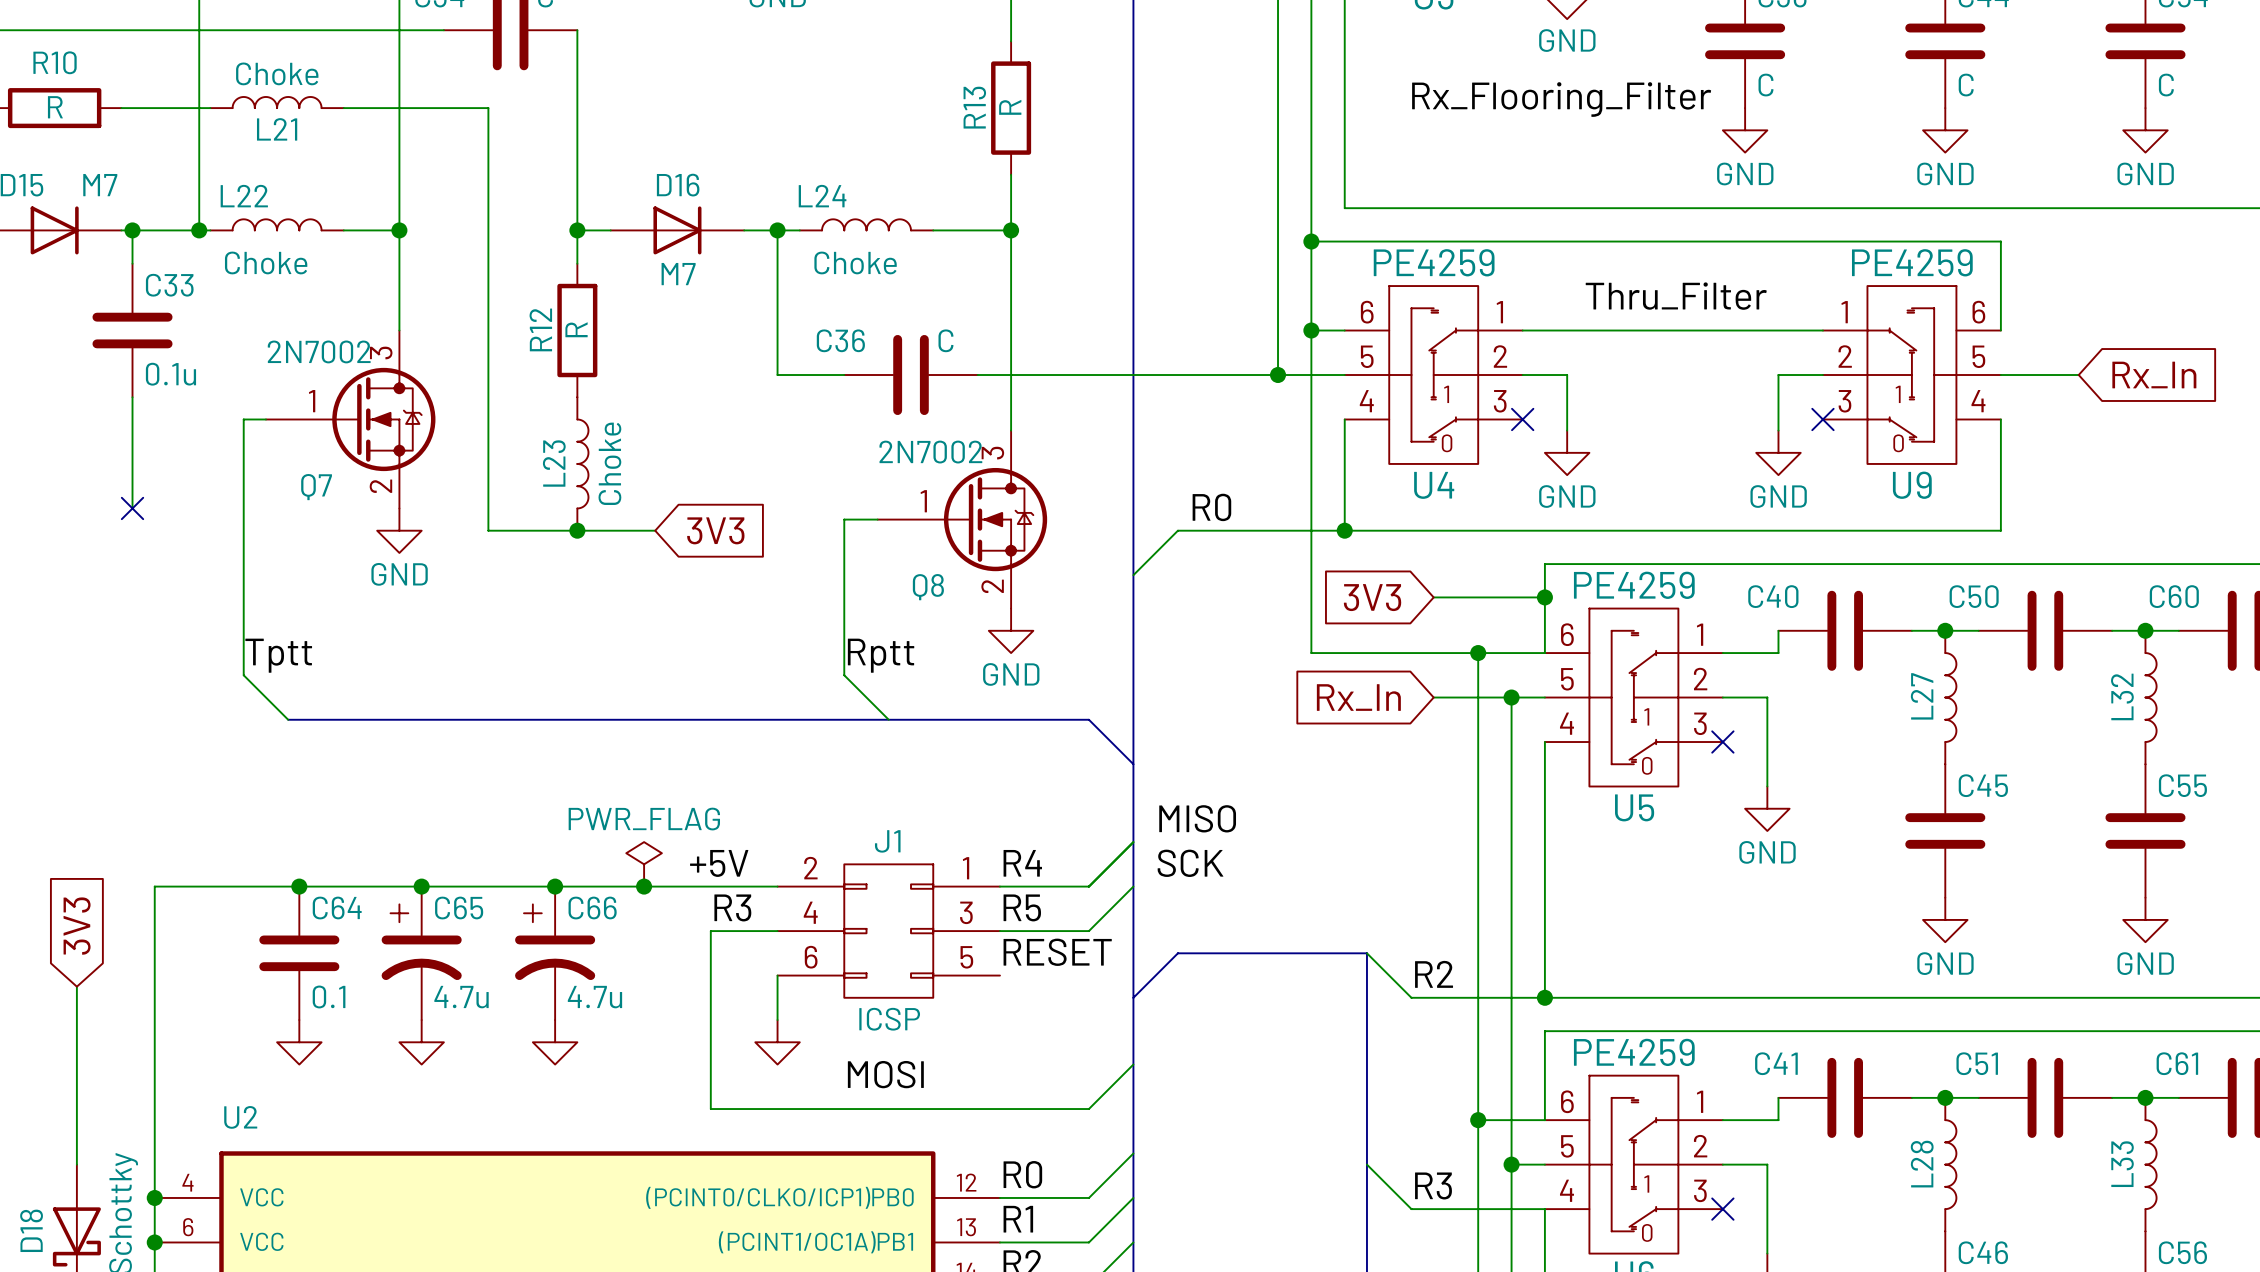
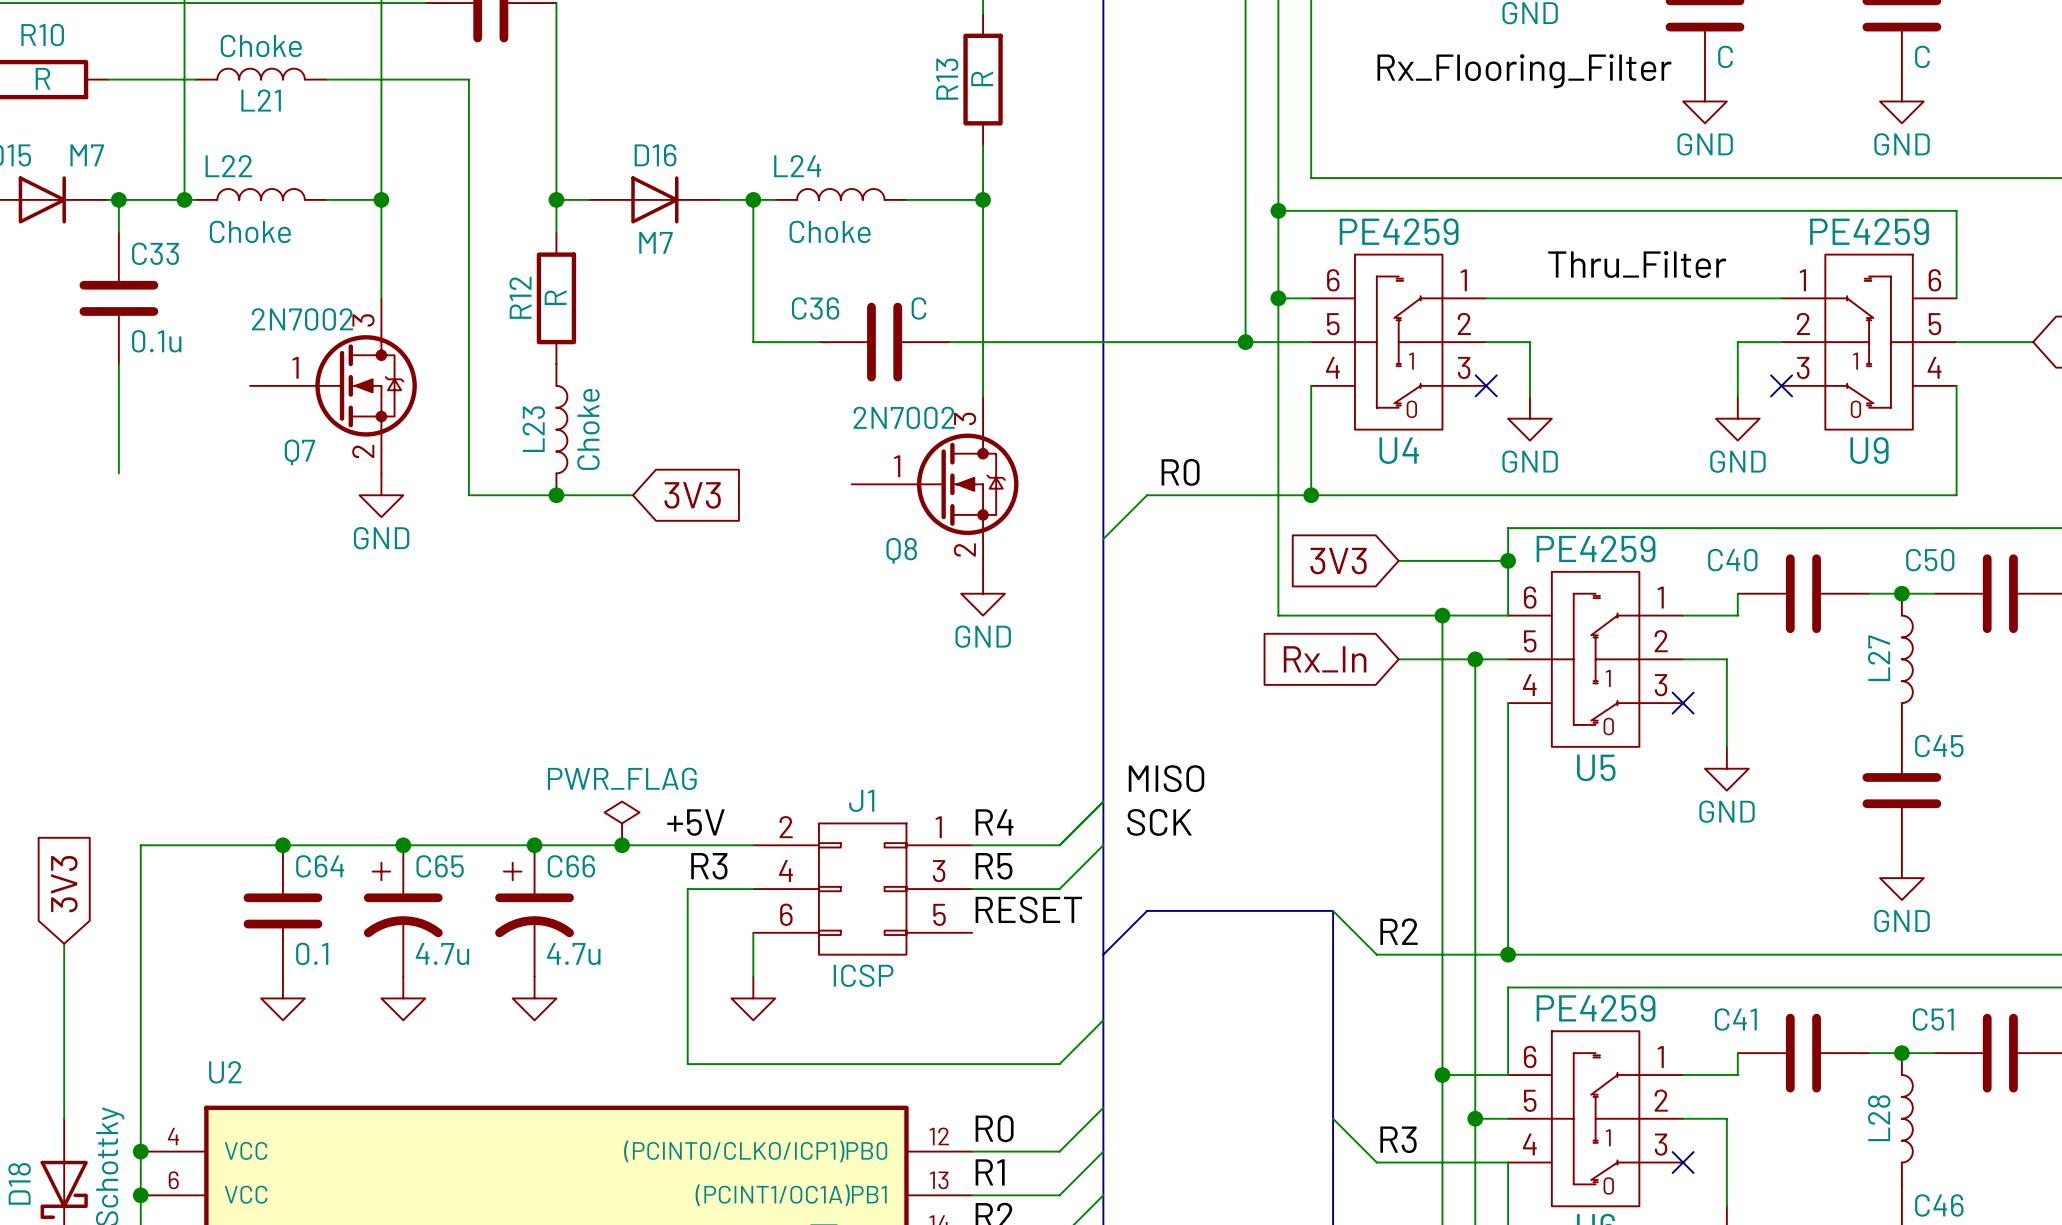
wire: (265, 419) (243, 419) (243, 675) (288, 719) -> none
no-connect mark: (132, 508) -> none
wire: (877, 519) (844, 519) (844, 675) (888, 719) -> none
label: Tptt (278, 655) -> none
label: Rptt (881, 655) -> none
bus: (288, 719) (1088, 719) (1133, 764) -> none
label: MOSI (885, 1074) -> none

